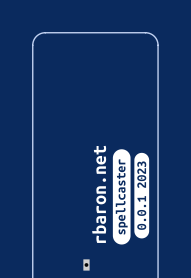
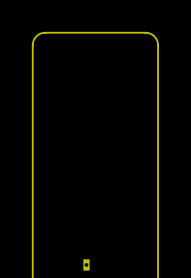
drawing: [92, 145, 150, 245] -> none

